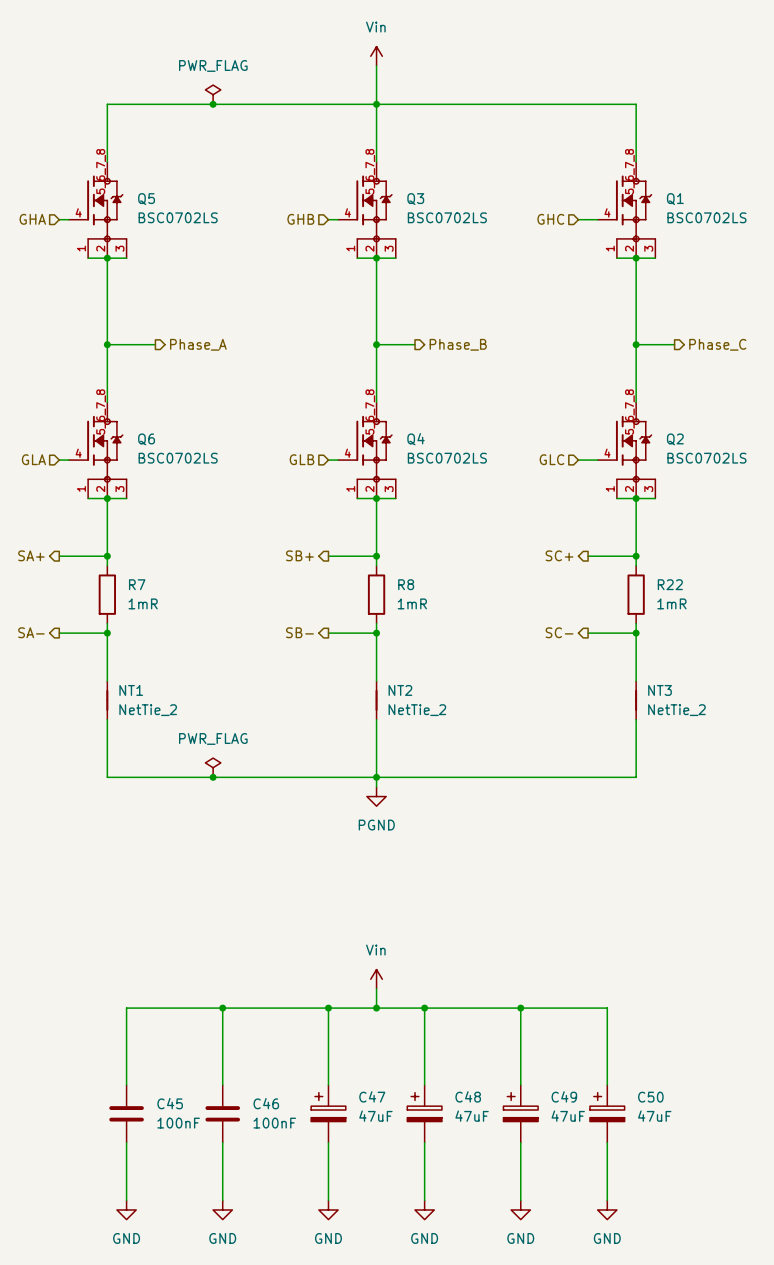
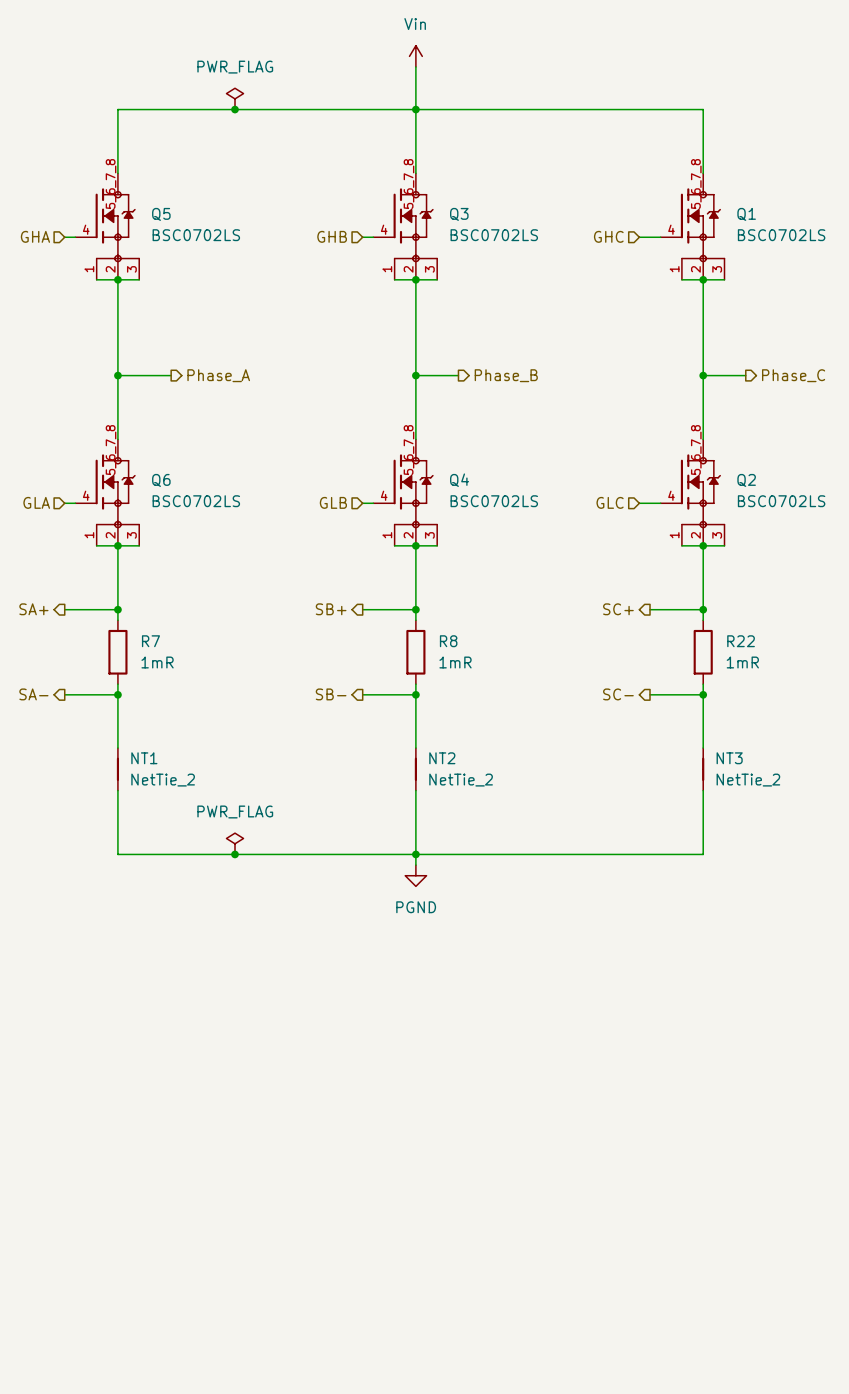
power symbol: Vin (376, 979) -> none
wire: (376, 988) (376, 1008) -> none
wire: (222, 1008) (222, 1085) -> none
junction: (222, 1008) -> none
wire: (328, 1008) (328, 1085) -> none
junction: (328, 1008) -> none
junction: (376, 1008) -> none
wire: (424, 1008) (424, 1085) -> none
junction: (424, 1008) -> none
wire: (520, 1008) (520, 1085) -> none
junction: (520, 1008) -> none
wire: (126, 1085) (126, 1008) (607, 1008) (607, 1085) -> none
C45: 100nF (126, 1113) -> none
C46: 100nF (222, 1113) -> none
C47: 47uF (328, 1113) -> none
C48: 47uF (424, 1113) -> none
C49: 47uF (520, 1113) -> none
C50: 47uF (607, 1113) -> none
wire: (126, 1142) (126, 1200) -> none
wire: (222, 1142) (222, 1200) -> none
wire: (328, 1142) (328, 1200) -> none
wire: (424, 1142) (424, 1200) -> none
wire: (520, 1142) (520, 1200) -> none
wire: (607, 1142) (607, 1200) -> none
power symbol: GND (126, 1209) -> none
power symbol: GND (222, 1209) -> none
power symbol: GND (328, 1209) -> none
power symbol: GND (424, 1209) -> none
power symbol: GND (520, 1209) -> none
power symbol: GND (607, 1209) -> none

